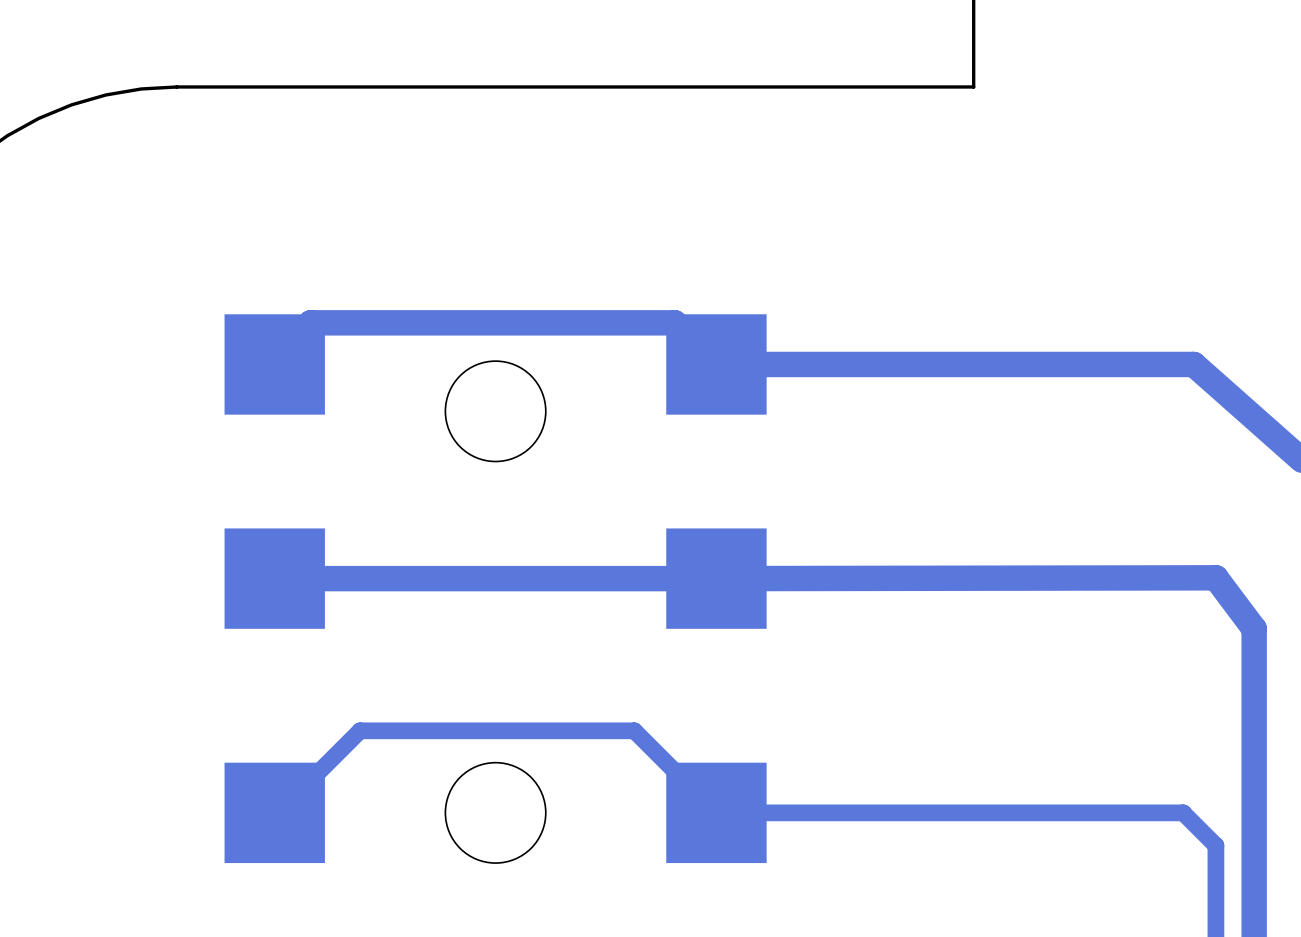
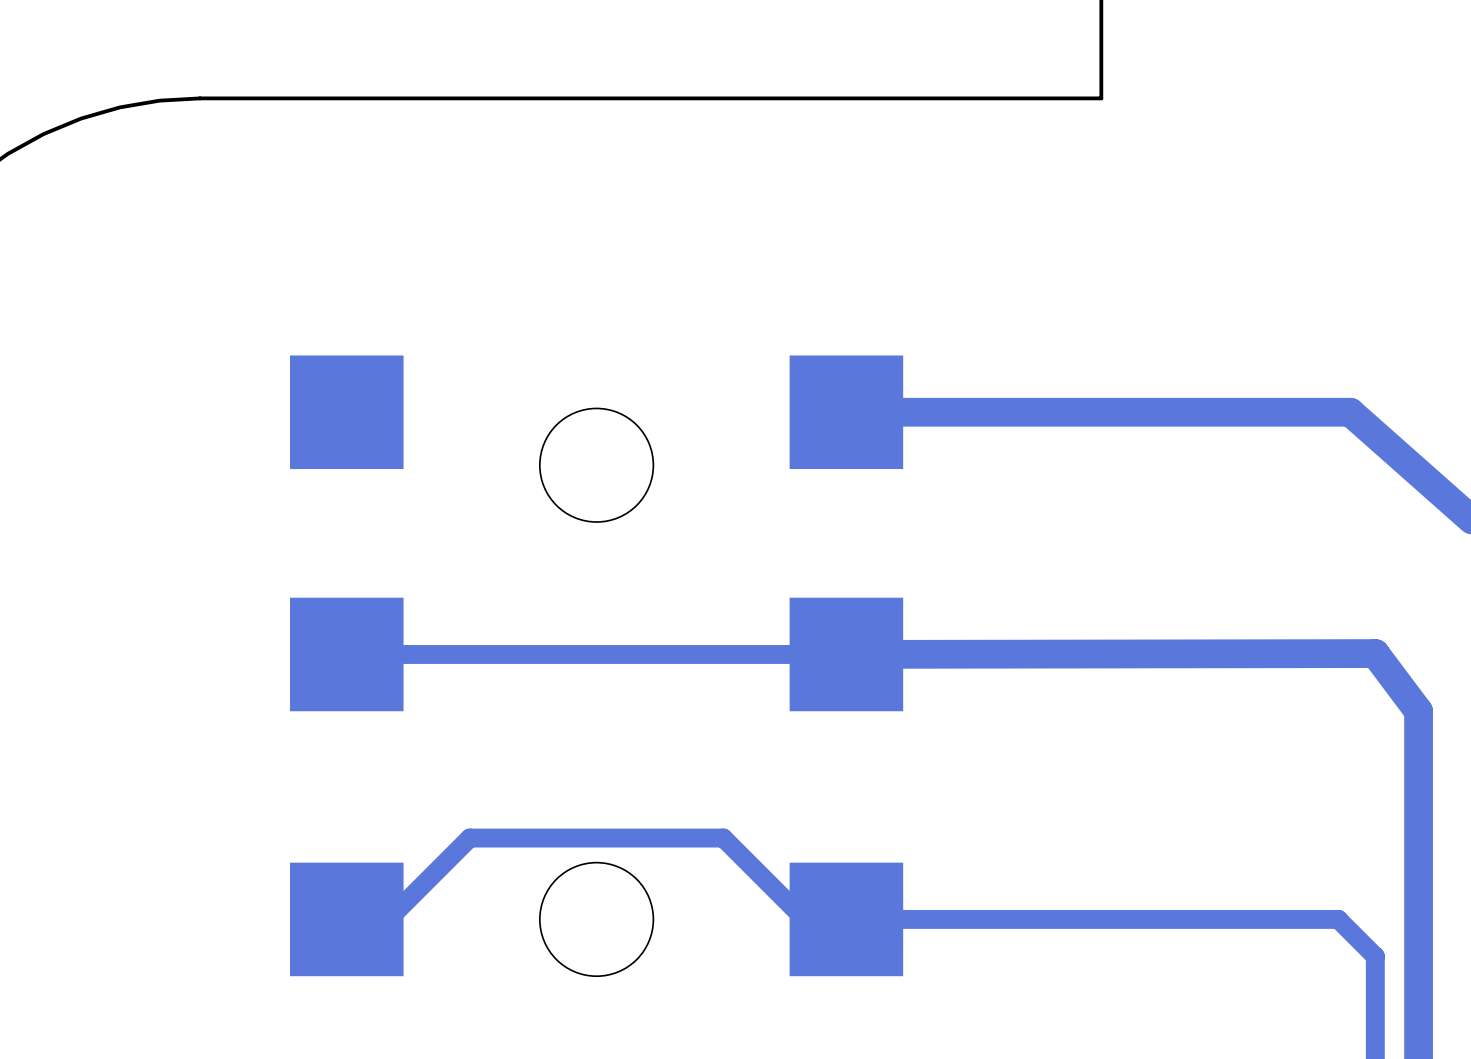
bottom track: (274, 364) (274, 358) (310, 322) (674, 322) (716, 364) -> none
bottom track width: thick (306, 578) (716, 578) -> thin (346, 654) (810, 654)
part position: (495, 588) -> (596, 665)
bottom track: (274, 812) (278, 812) (360, 730) (634, 730) (716, 812) -> (346, 919) (388, 919) (469, 838) (723, 838) (804, 919) (810, 919)

